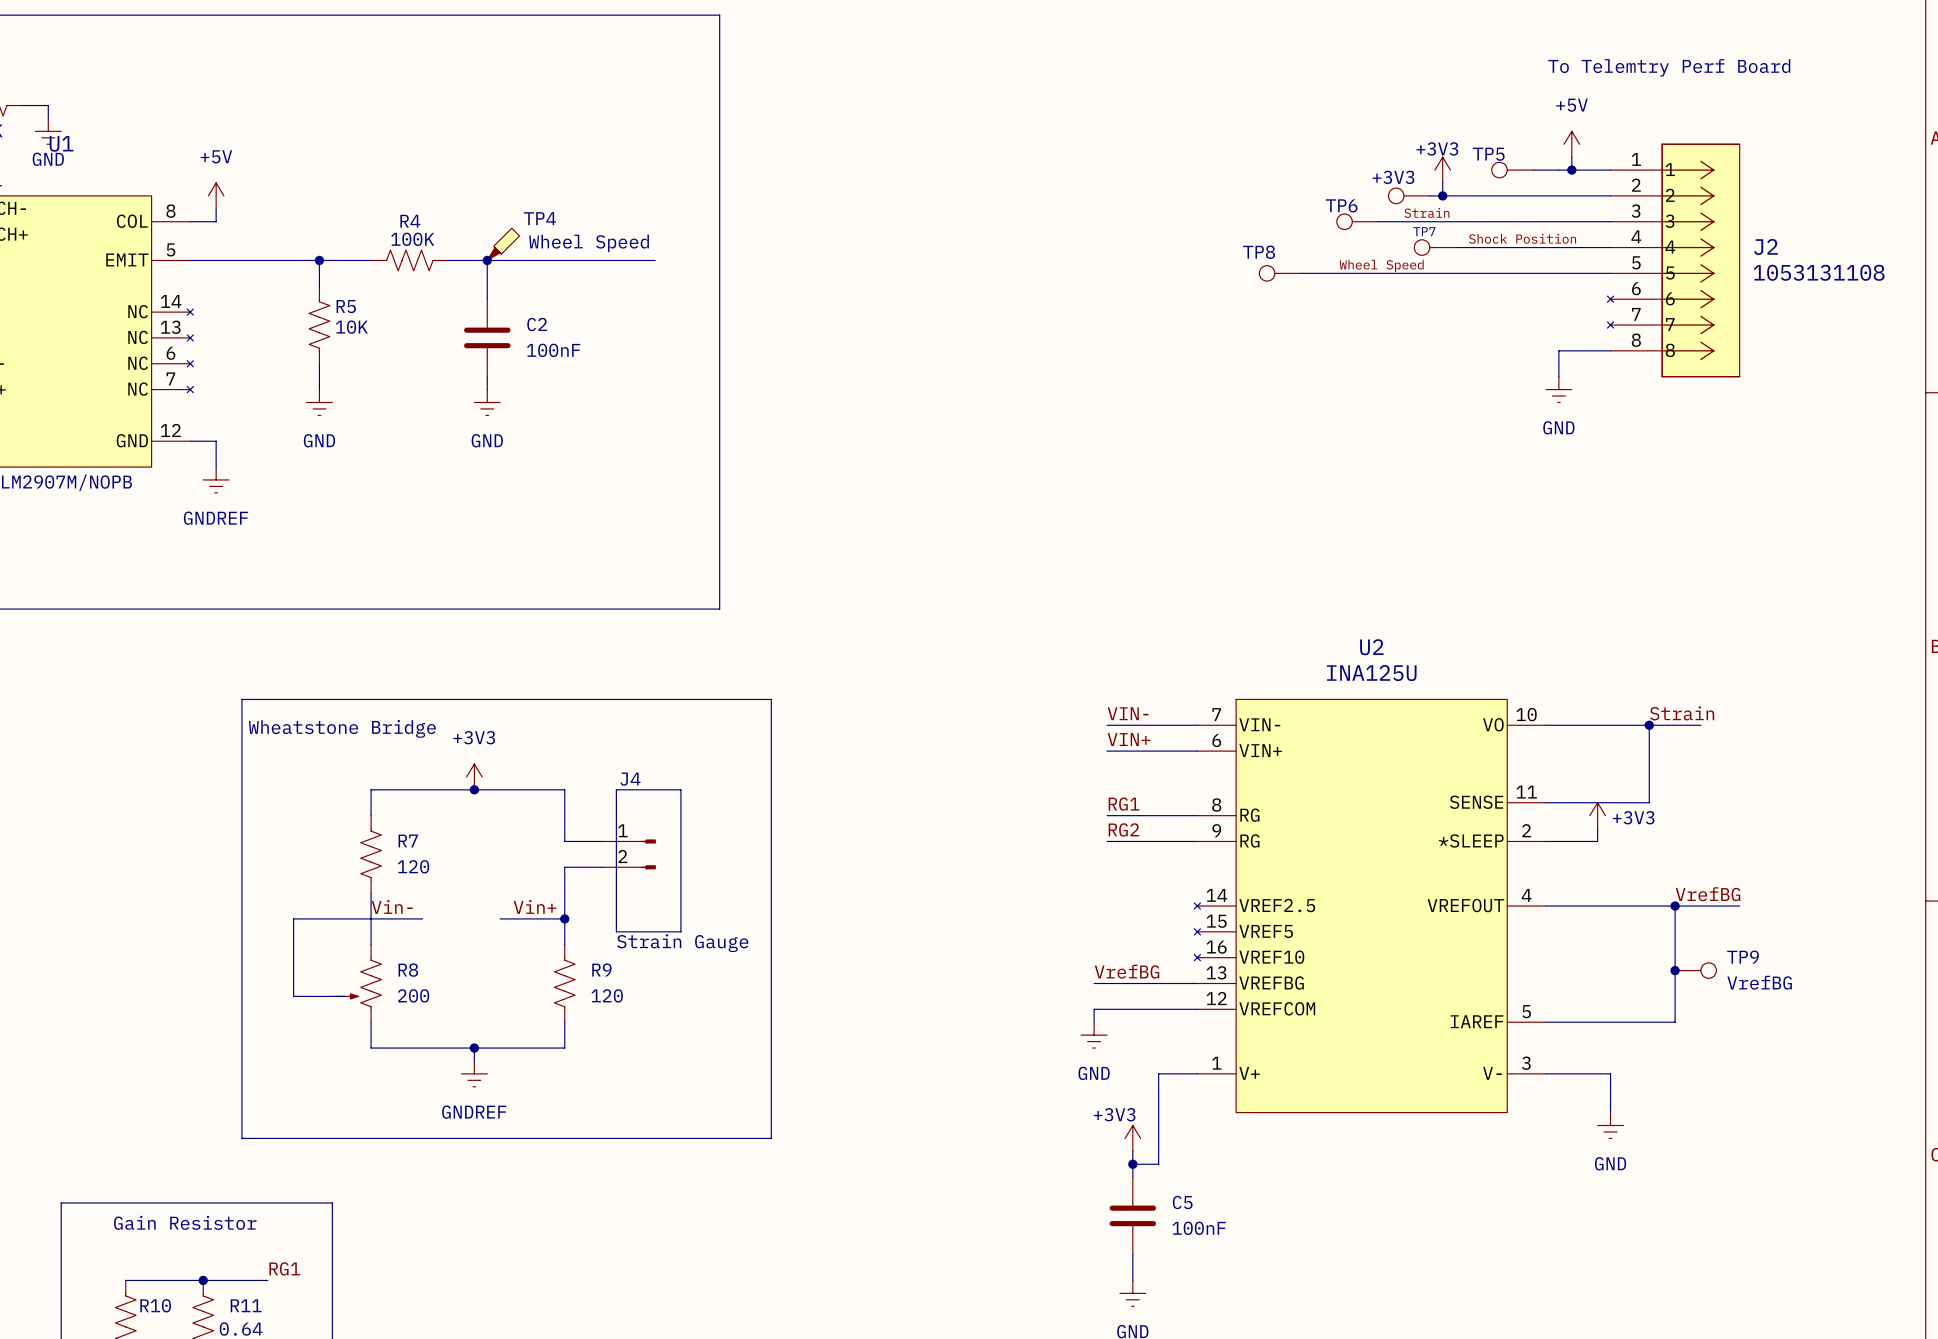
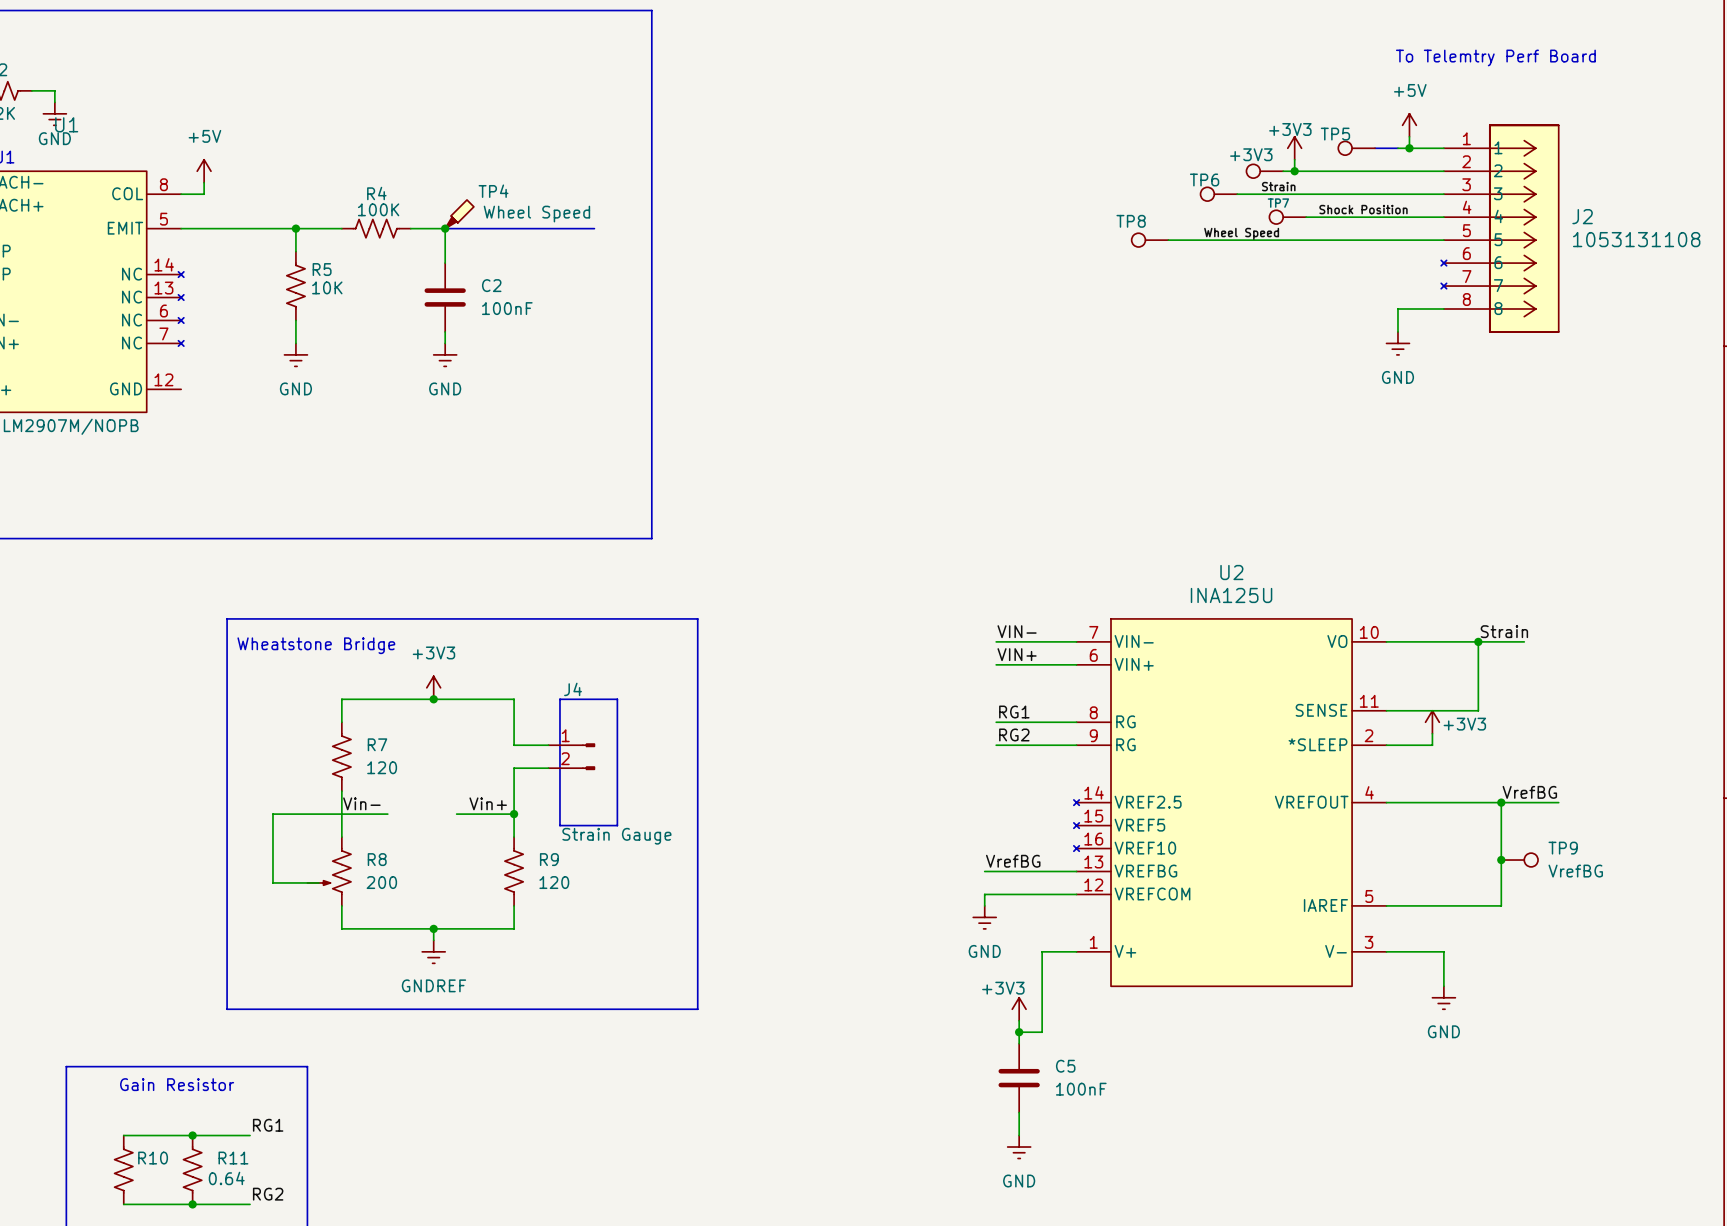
wire: (190, 441) (216, 441) (216, 467) -> none
power symbol: GNDREF (216, 479) -> none

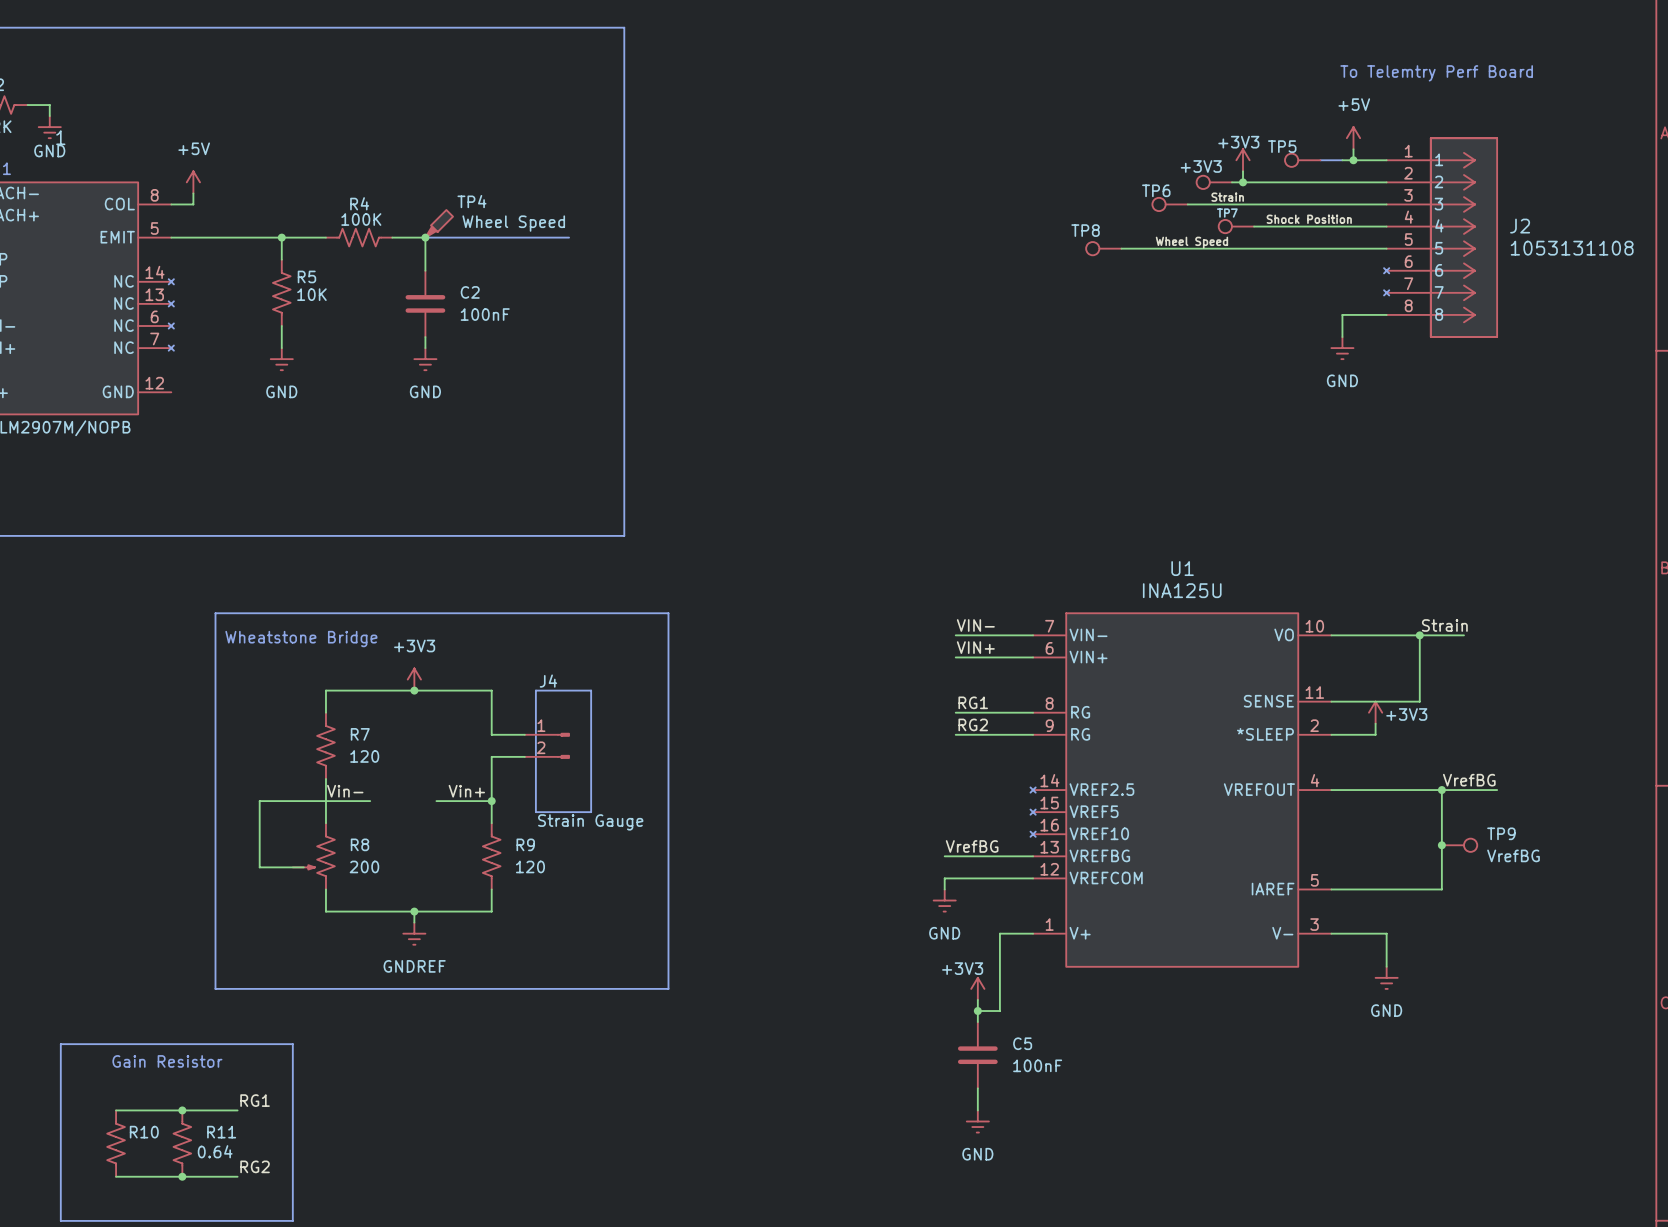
U1 name: U1 (66, 124) -> 1 (60, 137)
U2 name: U2 (1231, 572) -> U1 (1182, 568)

